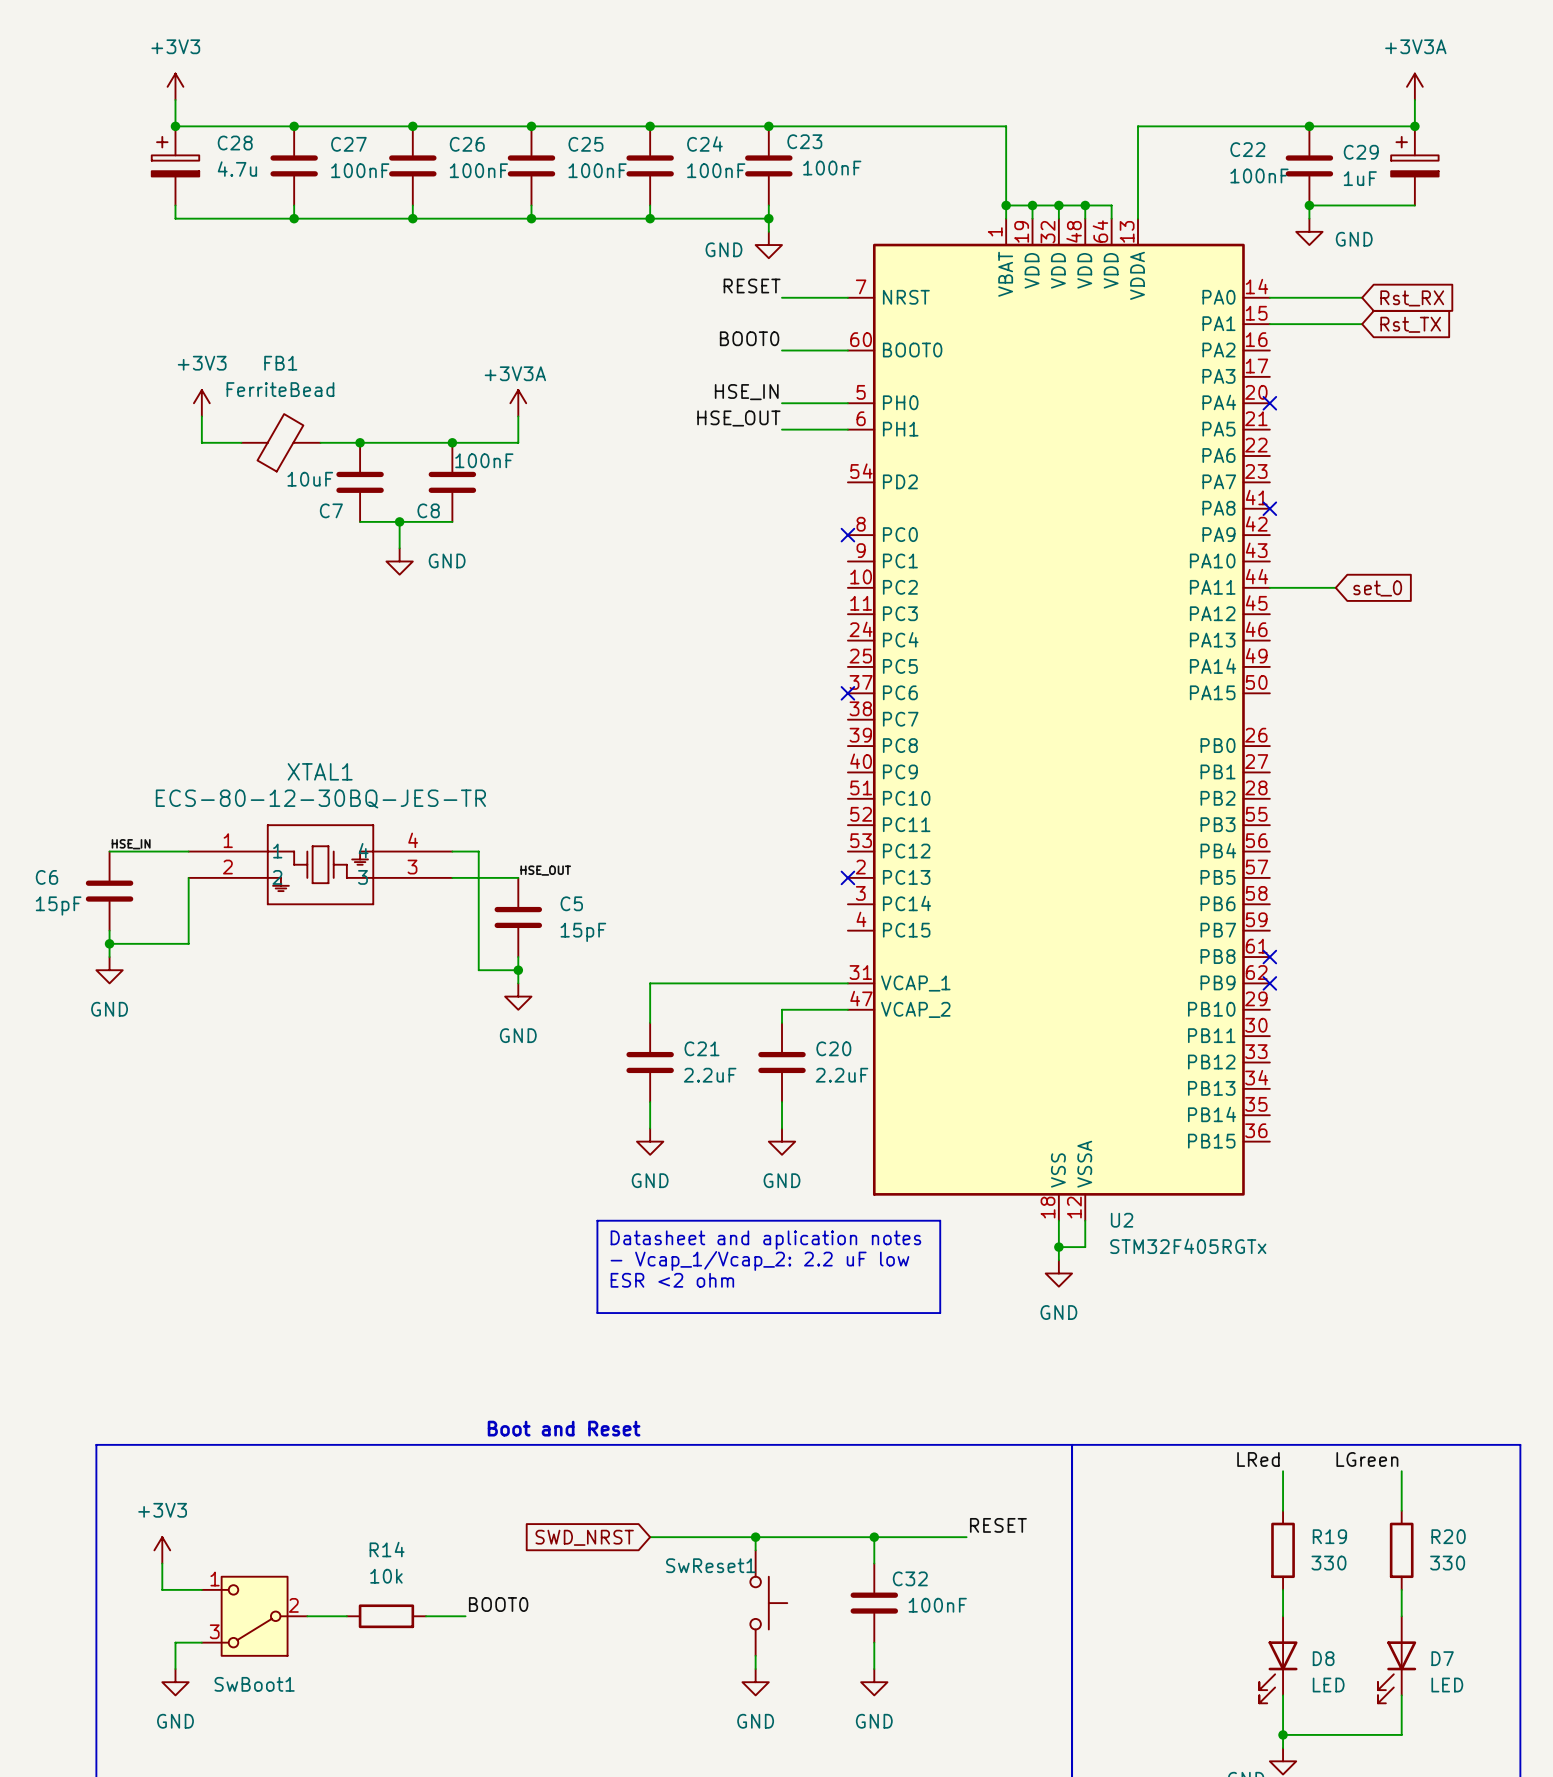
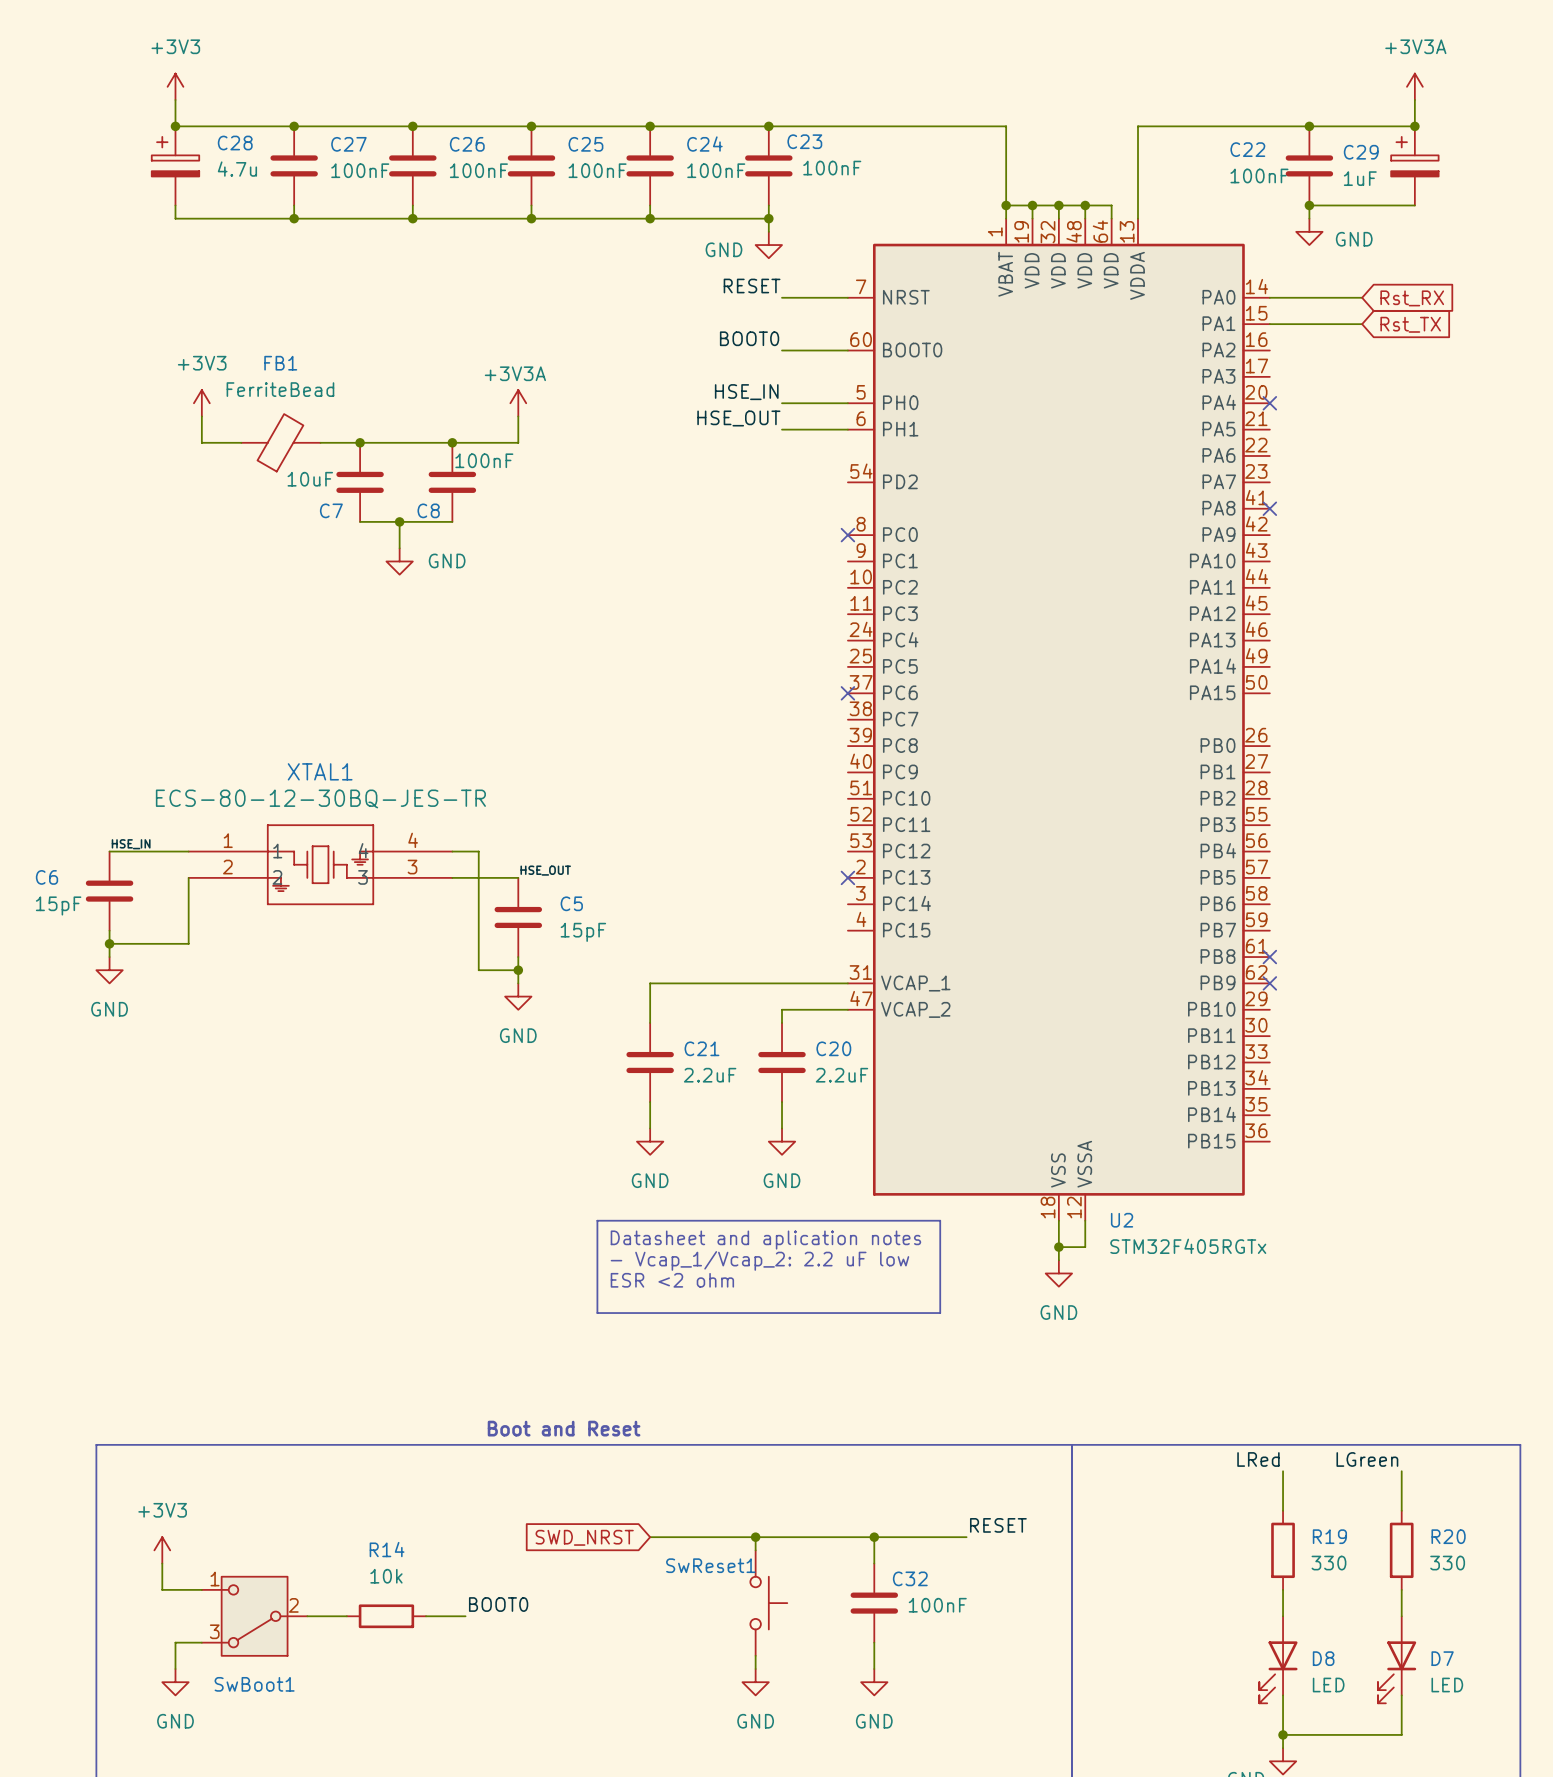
wire: (1269, 587) (1335, 587) -> none
global label: set_0 (1377, 588) -> none

